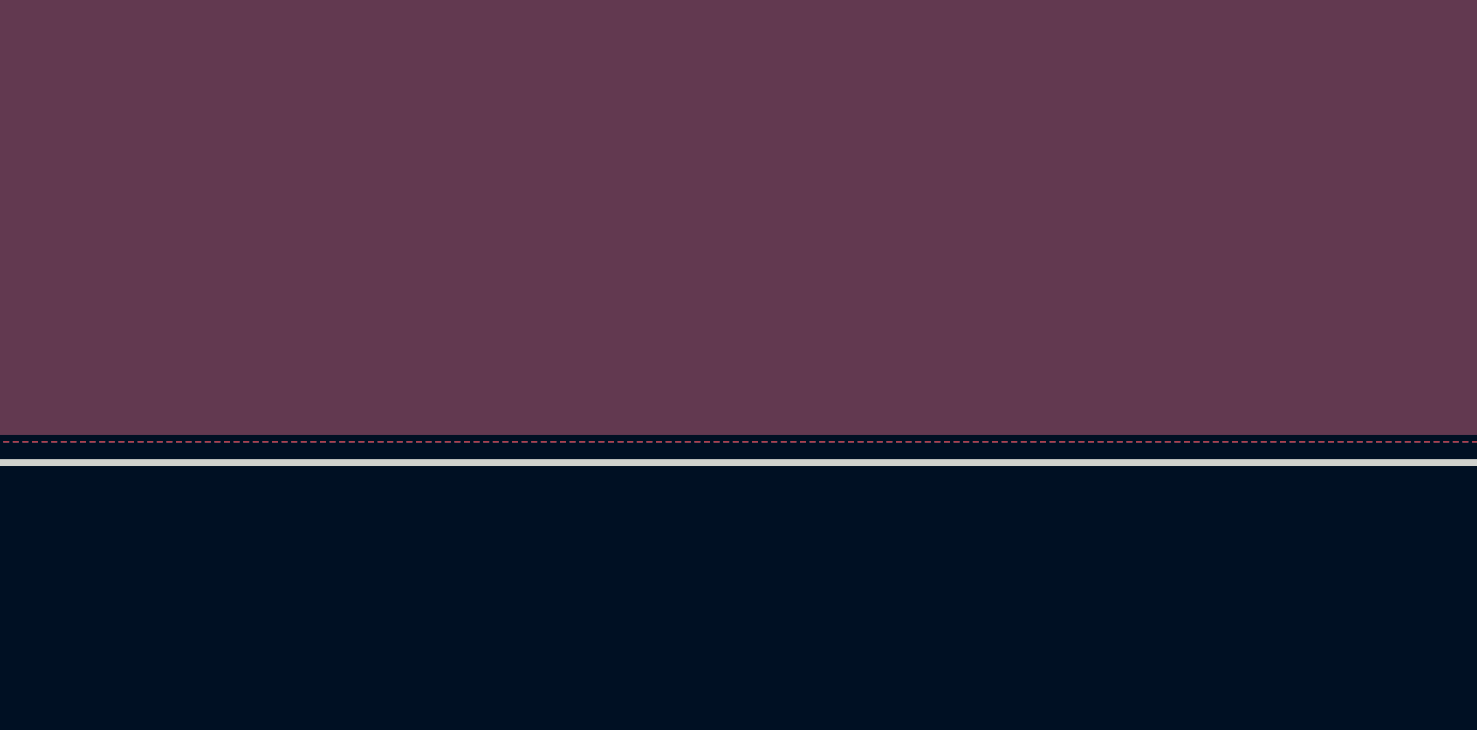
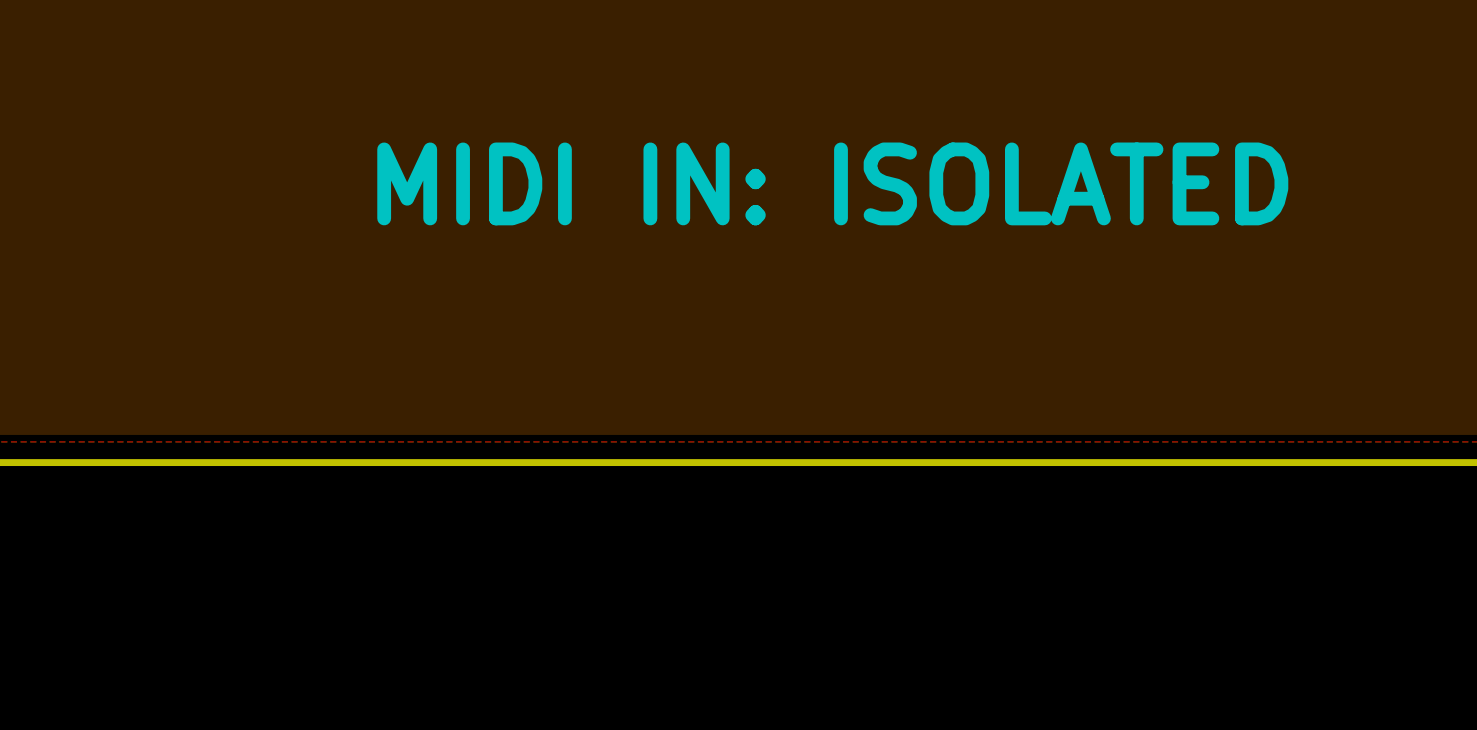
text: none -> MIDI IN: ISOLATED (832, 183)

